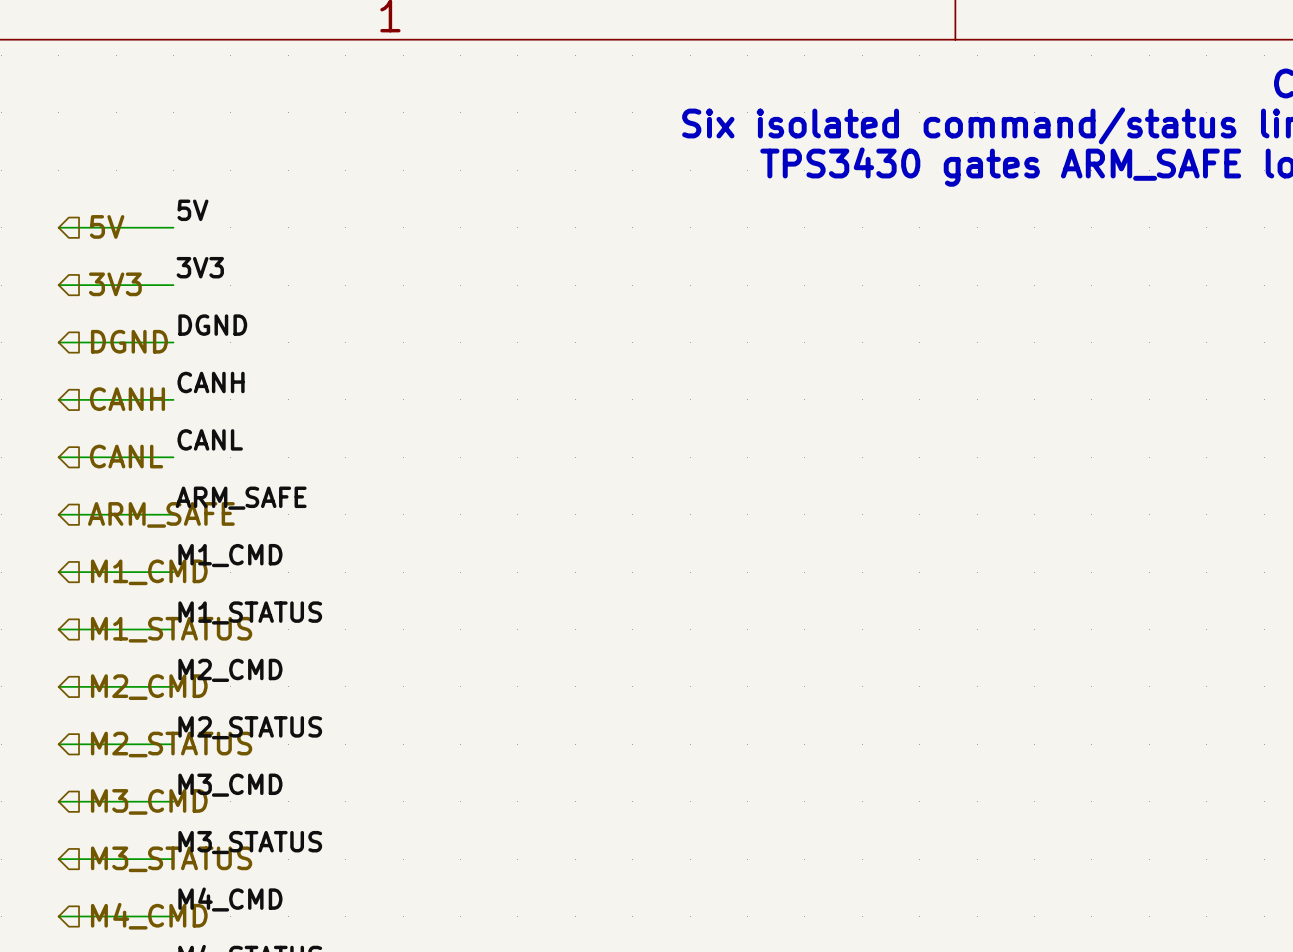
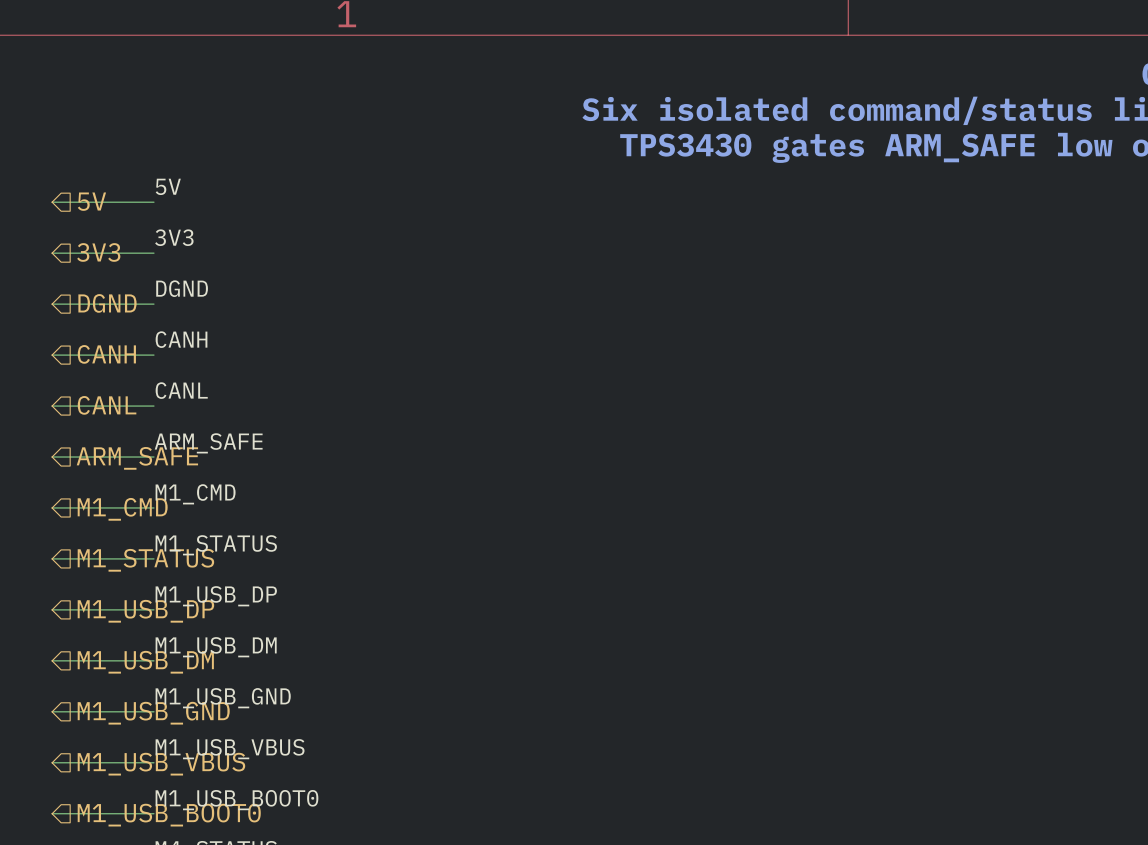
label: M2_CMD (230, 670) -> M1_USB_DP (216, 596)
hierarchical label: M2_CMD (149, 687) -> M1_USB_DP (145, 611)
label: M2_STATUS (250, 727) -> M1_USB_DM (216, 647)
hierarchical label: M2_STATUS (171, 744) -> M1_USB_DM (145, 662)
label: M3_CMD (230, 785) -> M1_USB_GND (223, 698)
hierarchical label: M3_CMD (149, 801) -> M1_USB_GND (153, 713)
label: M3_STATUS (250, 842) -> M1_USB_VBUS (230, 749)
hierarchical label: M3_STATUS (171, 859) -> M1_USB_VBUS (161, 764)
label: M4_CMD (230, 899) -> M1_USB_BOOT0 (236, 800)
hierarchical label: M4_CMD (149, 916) -> M1_USB_BOOT0 (169, 815)

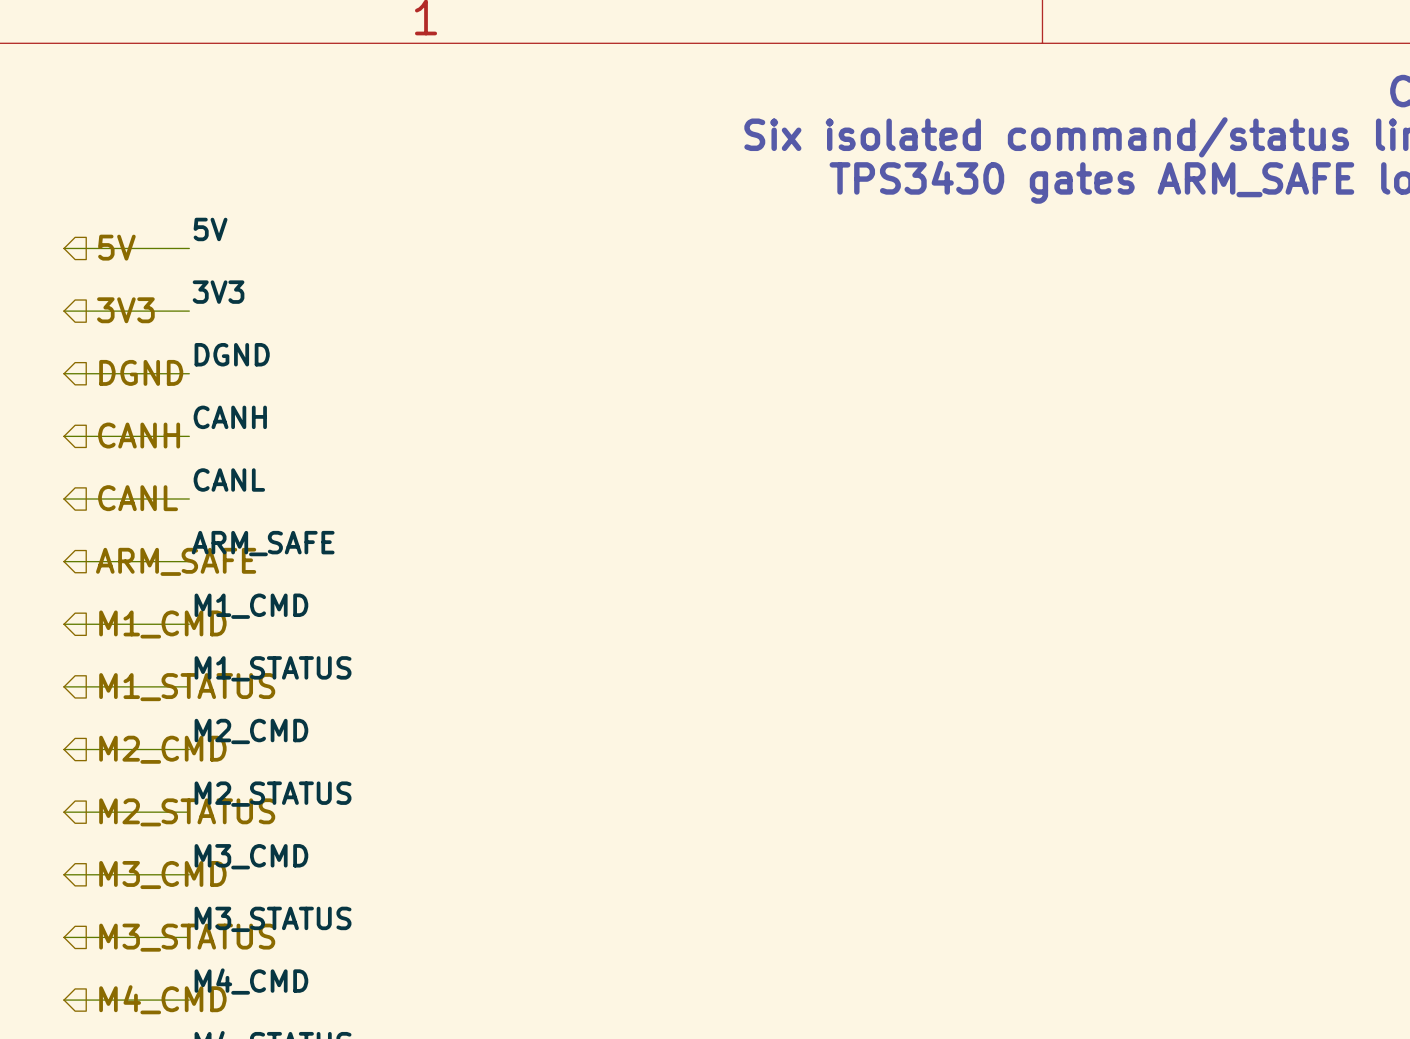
label: M1_USB_DP (216, 596) -> M2_CMD (251, 731)
hierarchical label: M1_USB_DP (145, 611) -> M2_CMD (162, 749)
label: M1_USB_DM (216, 647) -> M2_STATUS (273, 794)
hierarchical label: M1_USB_DM (145, 662) -> M2_STATUS (187, 812)
label: M1_USB_GND (223, 698) -> M3_CMD (251, 856)
hierarchical label: M1_USB_GND (153, 713) -> M3_CMD (162, 875)
label: M1_USB_VBUS (230, 749) -> M3_STATUS (273, 919)
hierarchical label: M1_USB_VBUS (161, 764) -> M3_STATUS (187, 937)
label: M1_USB_BOOT0 (236, 800) -> M4_CMD (251, 981)
hierarchical label: M1_USB_BOOT0 (169, 815) -> M4_CMD (162, 999)

